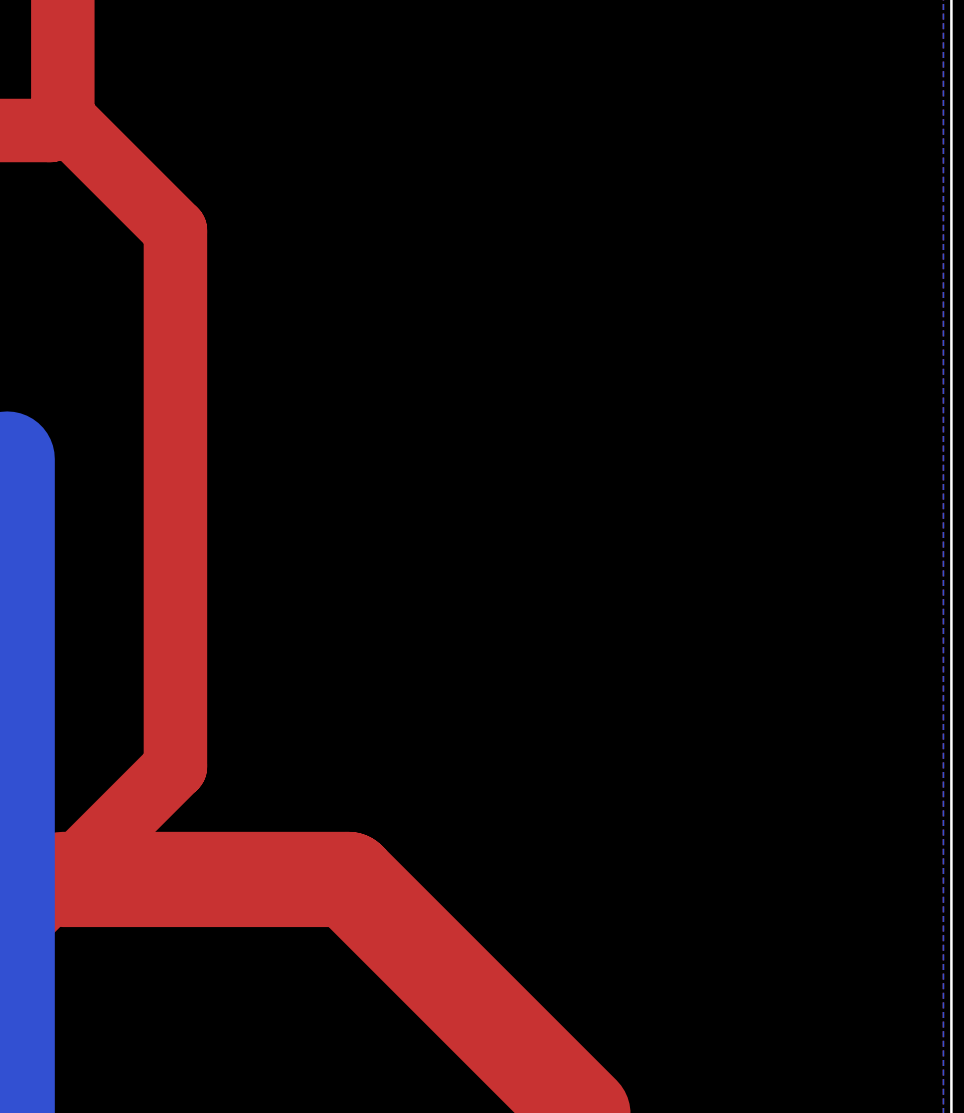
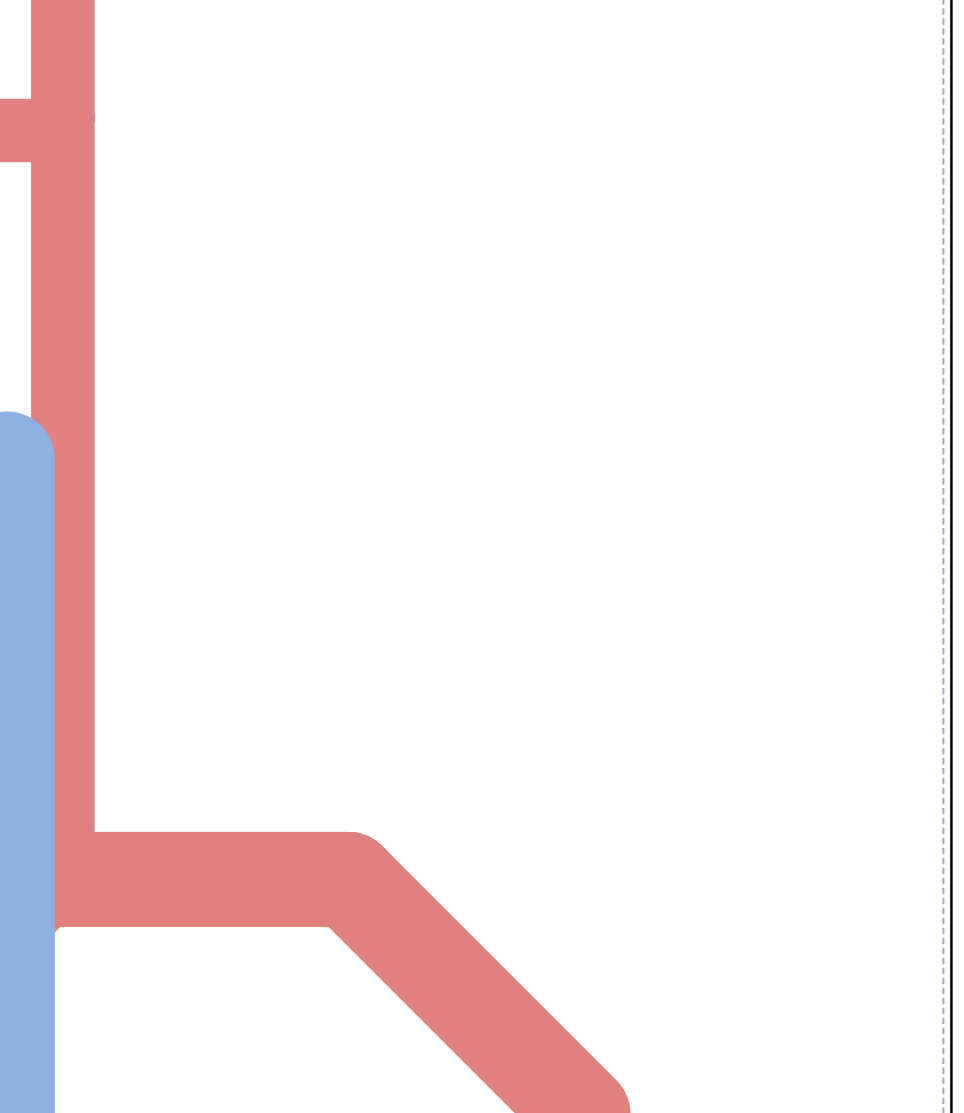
top track: (62, 117) (175, 230) (175, 766) (62, 879) -> (62, 117) (62, 879)

